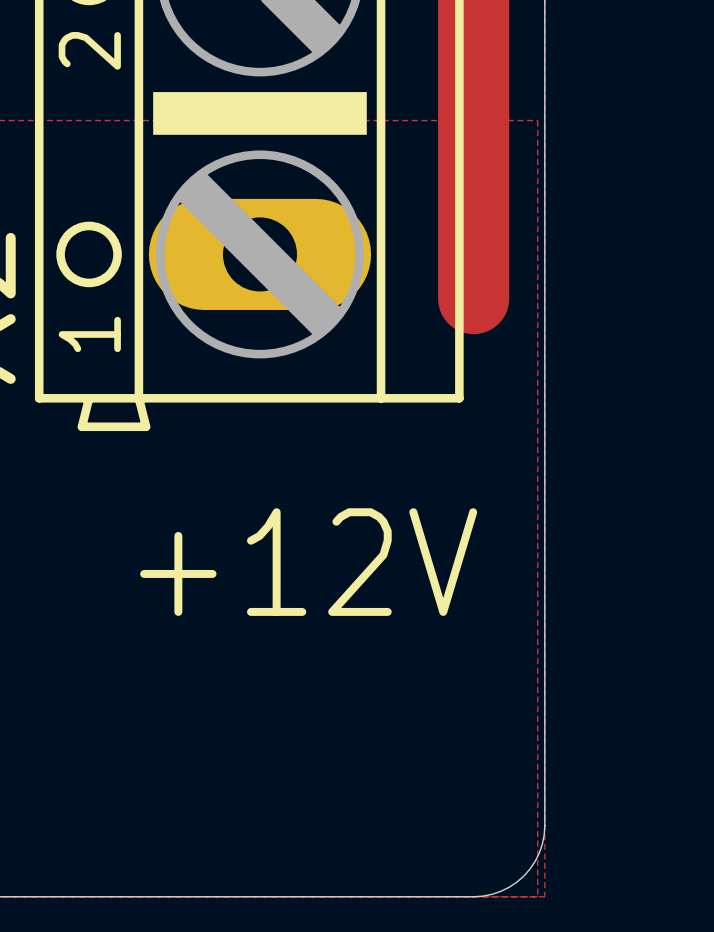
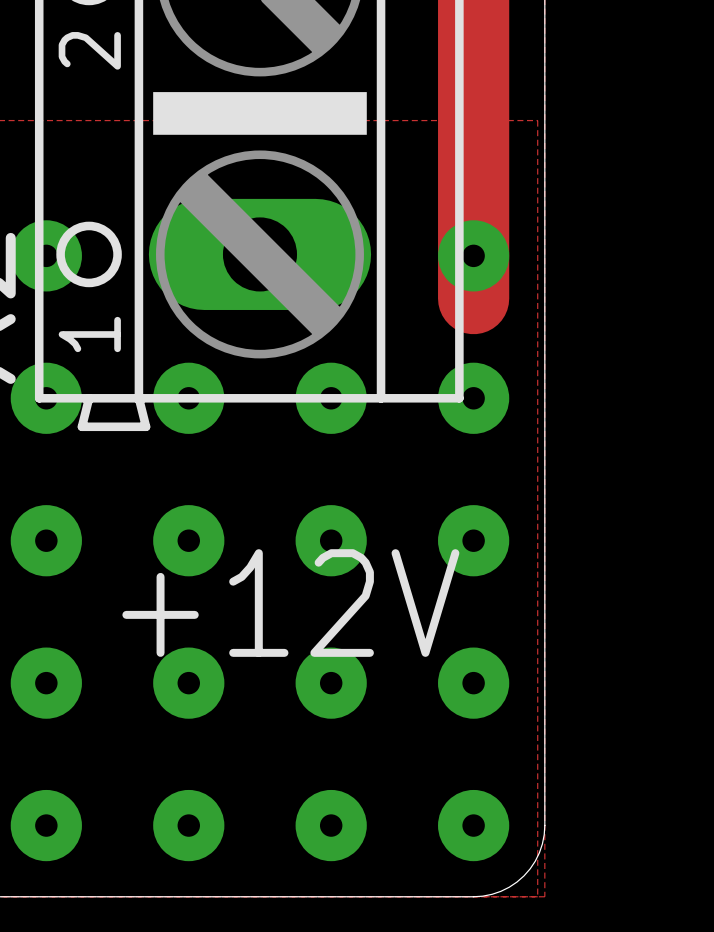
via: none -> (46, 255)
via: none -> (473, 255)
via: none -> (46, 398)
via: none -> (188, 398)
via: none -> (331, 398)
via: none -> (473, 398)
via: none -> (46, 540)
via: none -> (188, 540)
via: none -> (331, 540)
via: none -> (473, 540)
text position: +12V (308, 562) -> +12V (290, 603)
via: none -> (46, 683)
via: none -> (188, 683)
via: none -> (331, 683)
via: none -> (473, 683)
via: none -> (46, 825)
via: none -> (188, 825)
via: none -> (331, 825)
via: none -> (473, 825)

